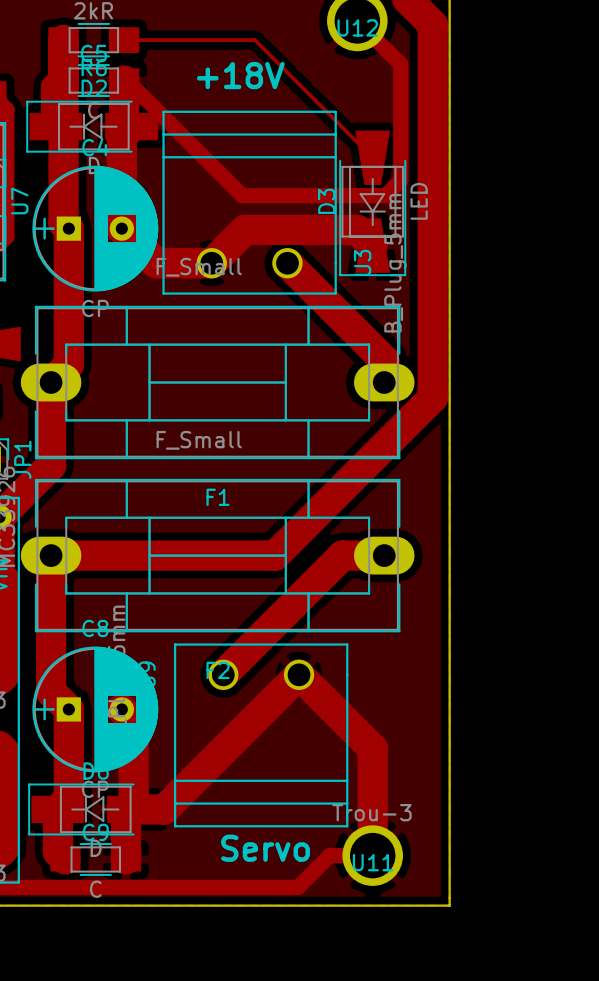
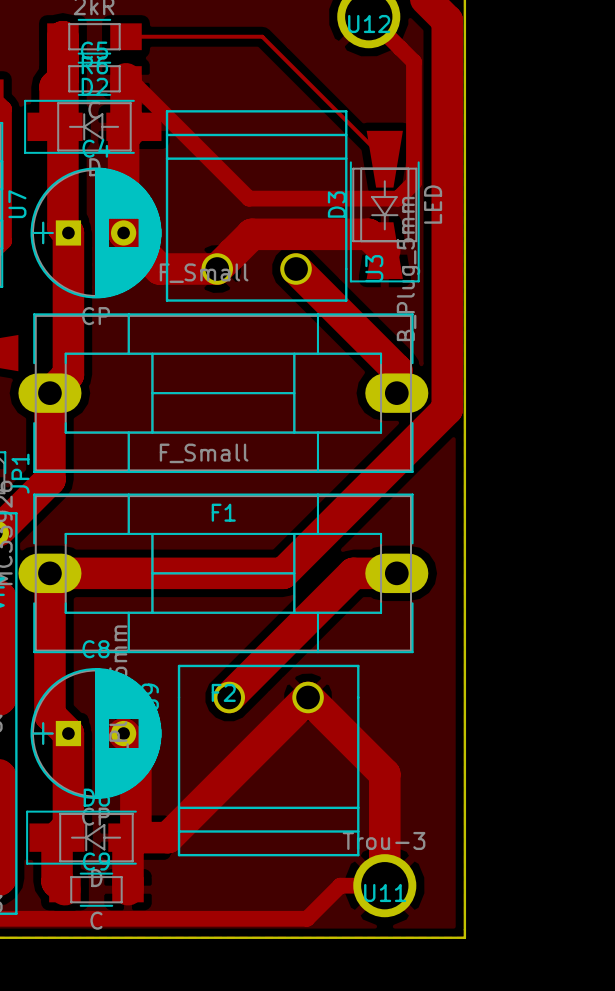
text: +18V (240, 75) -> none
text: Servo (265, 848) -> none

